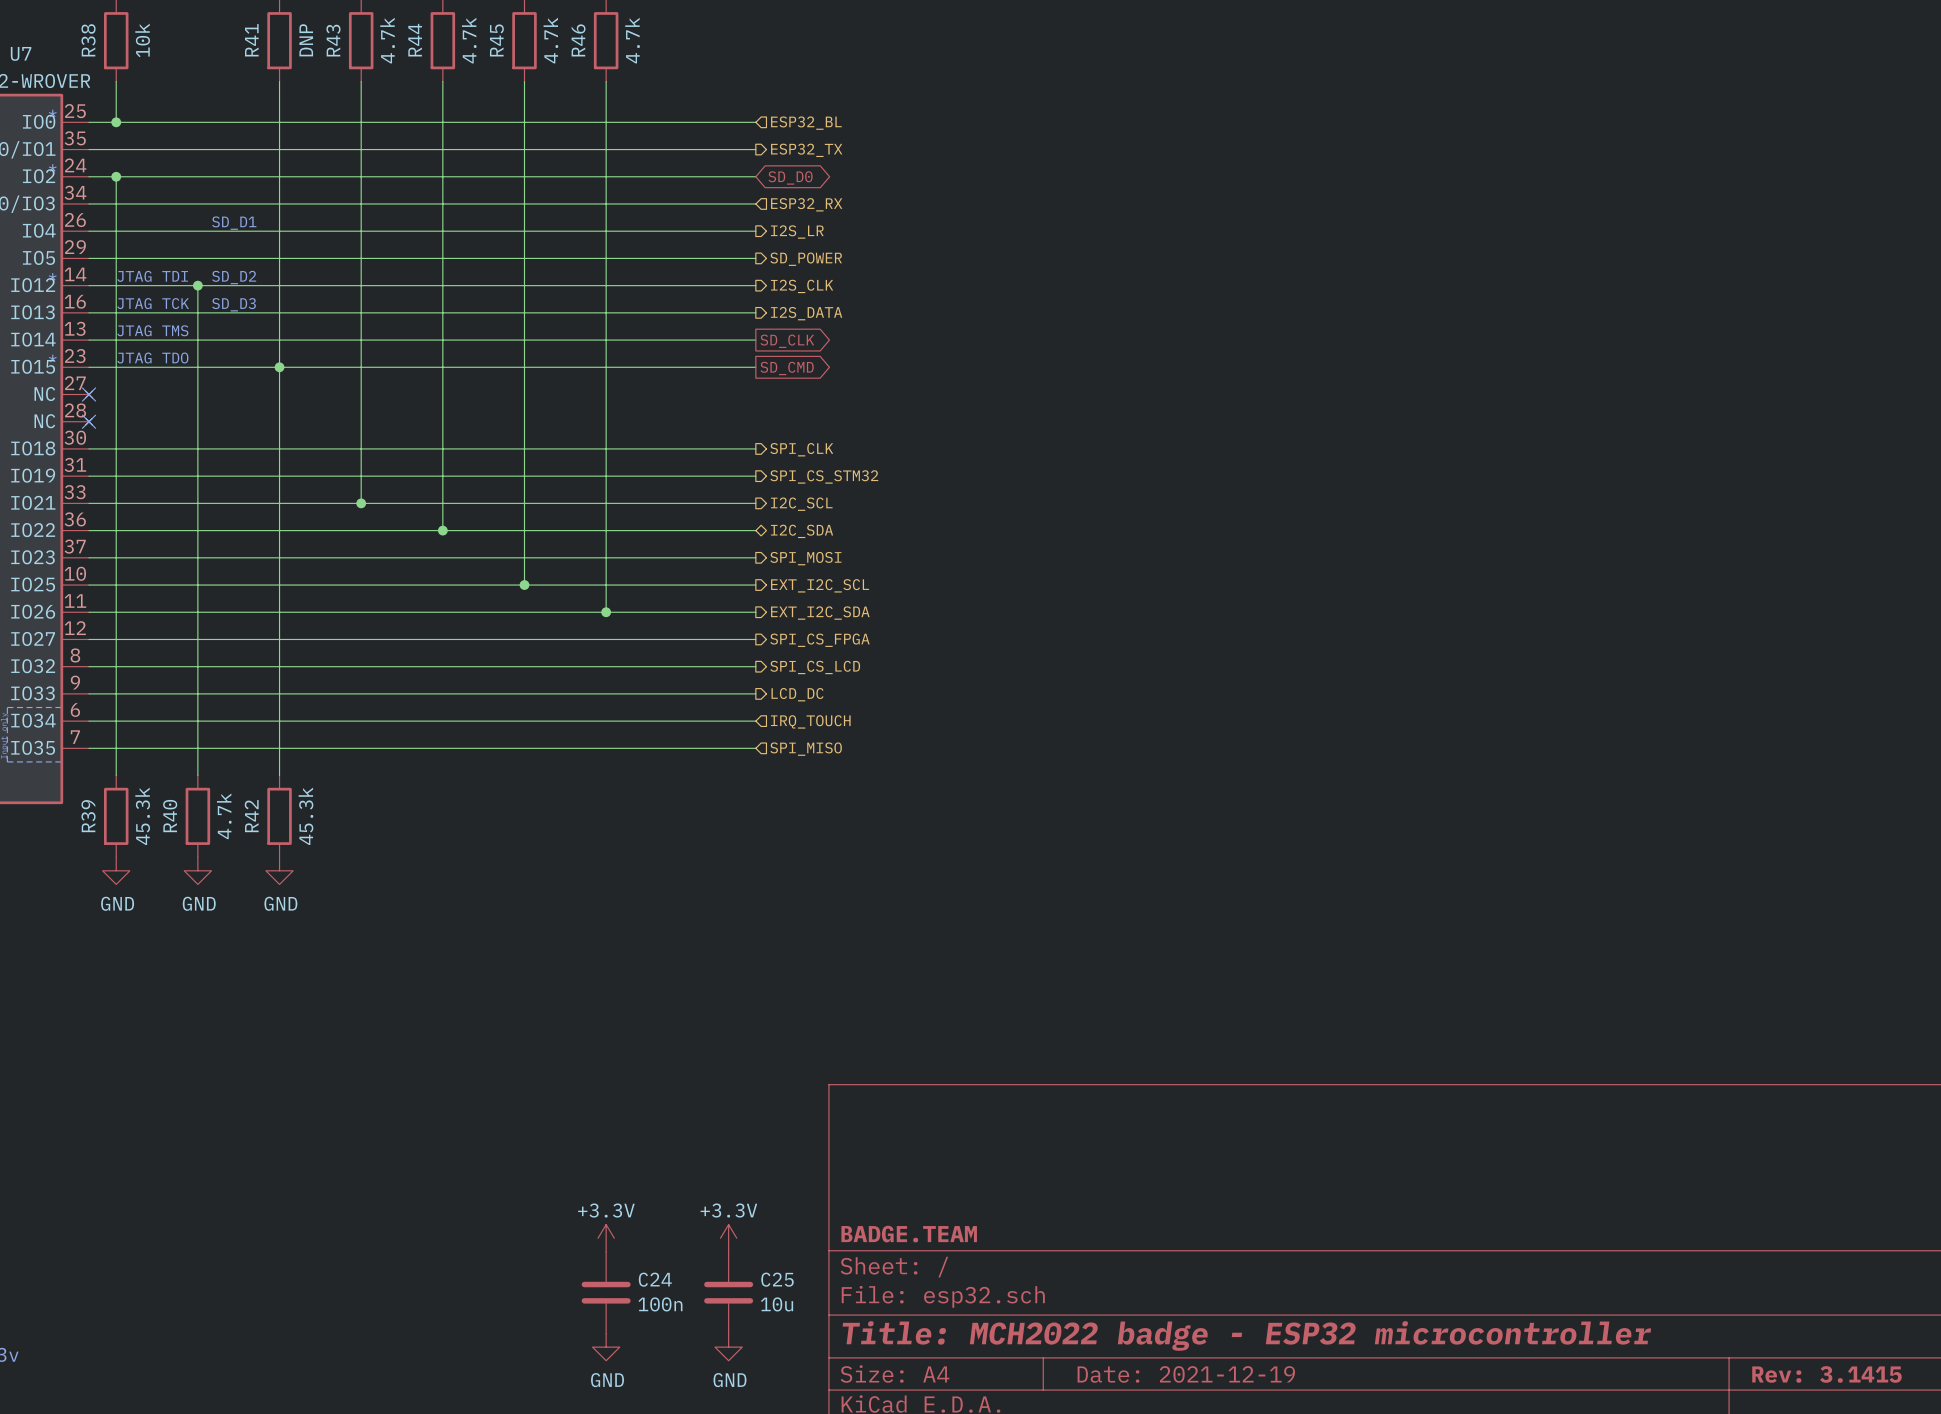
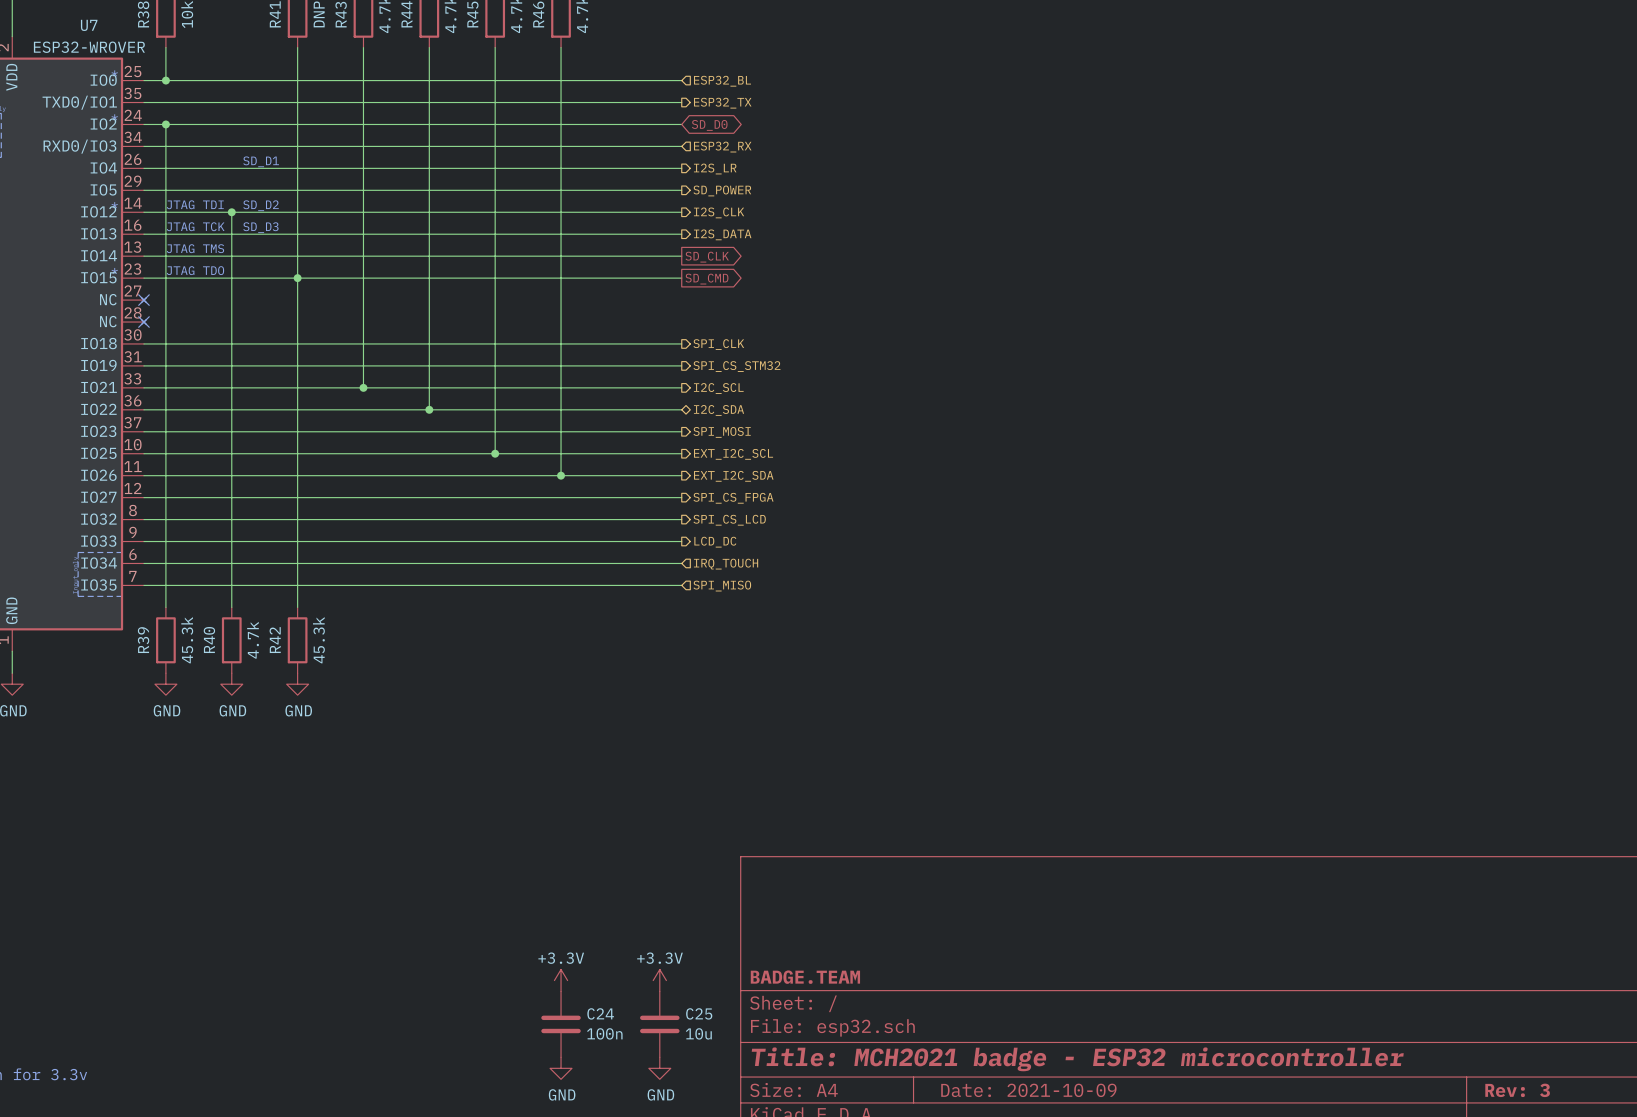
title block: Title: MCH2022 badge - ESP32 microcontroller (1246, 1335) -> Title: MCH2021 badge - ESP32 microcontroller (1077, 1059)
title block: Date: 2021-12-19 (1186, 1374) -> Date: 2021-10-09 (1028, 1090)
title block: Rev: 3.1415 (1826, 1374) -> Rev: 3 (1517, 1090)

